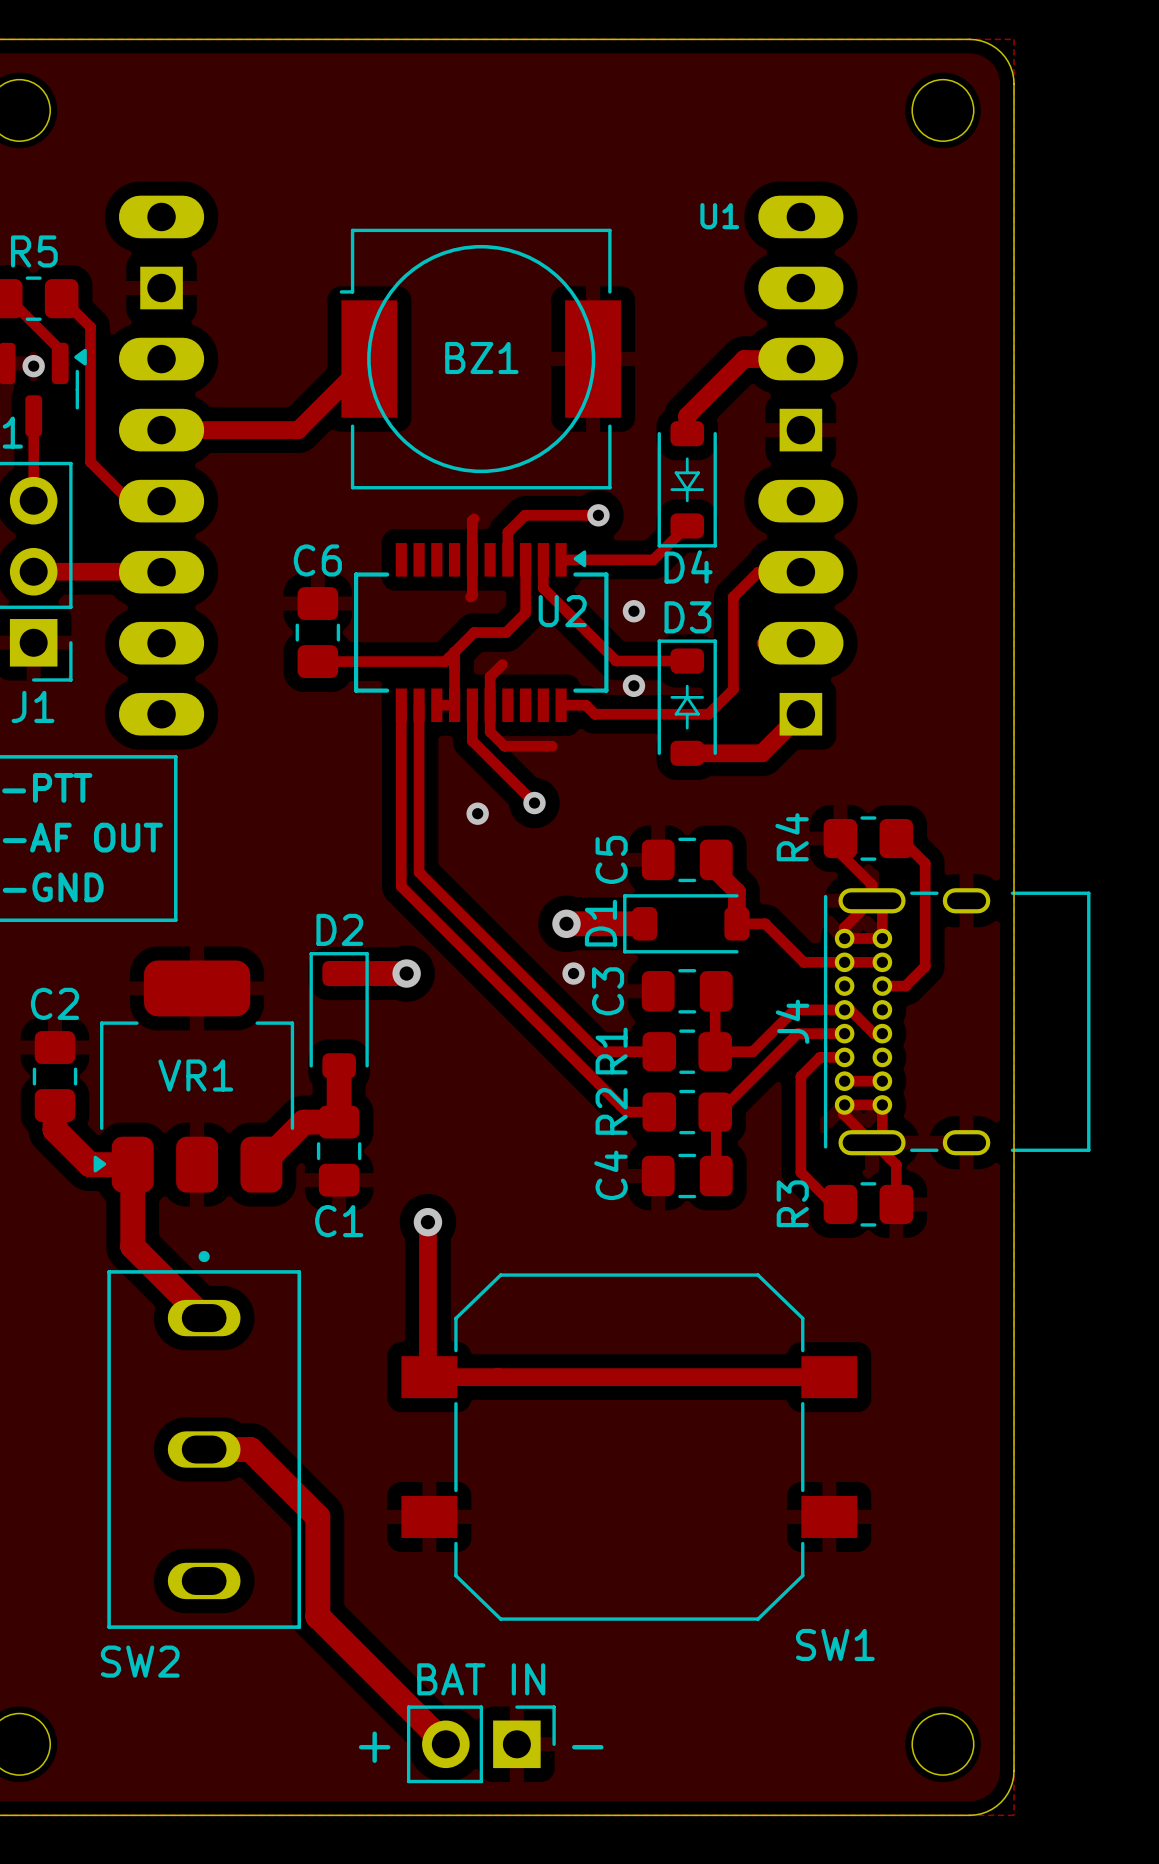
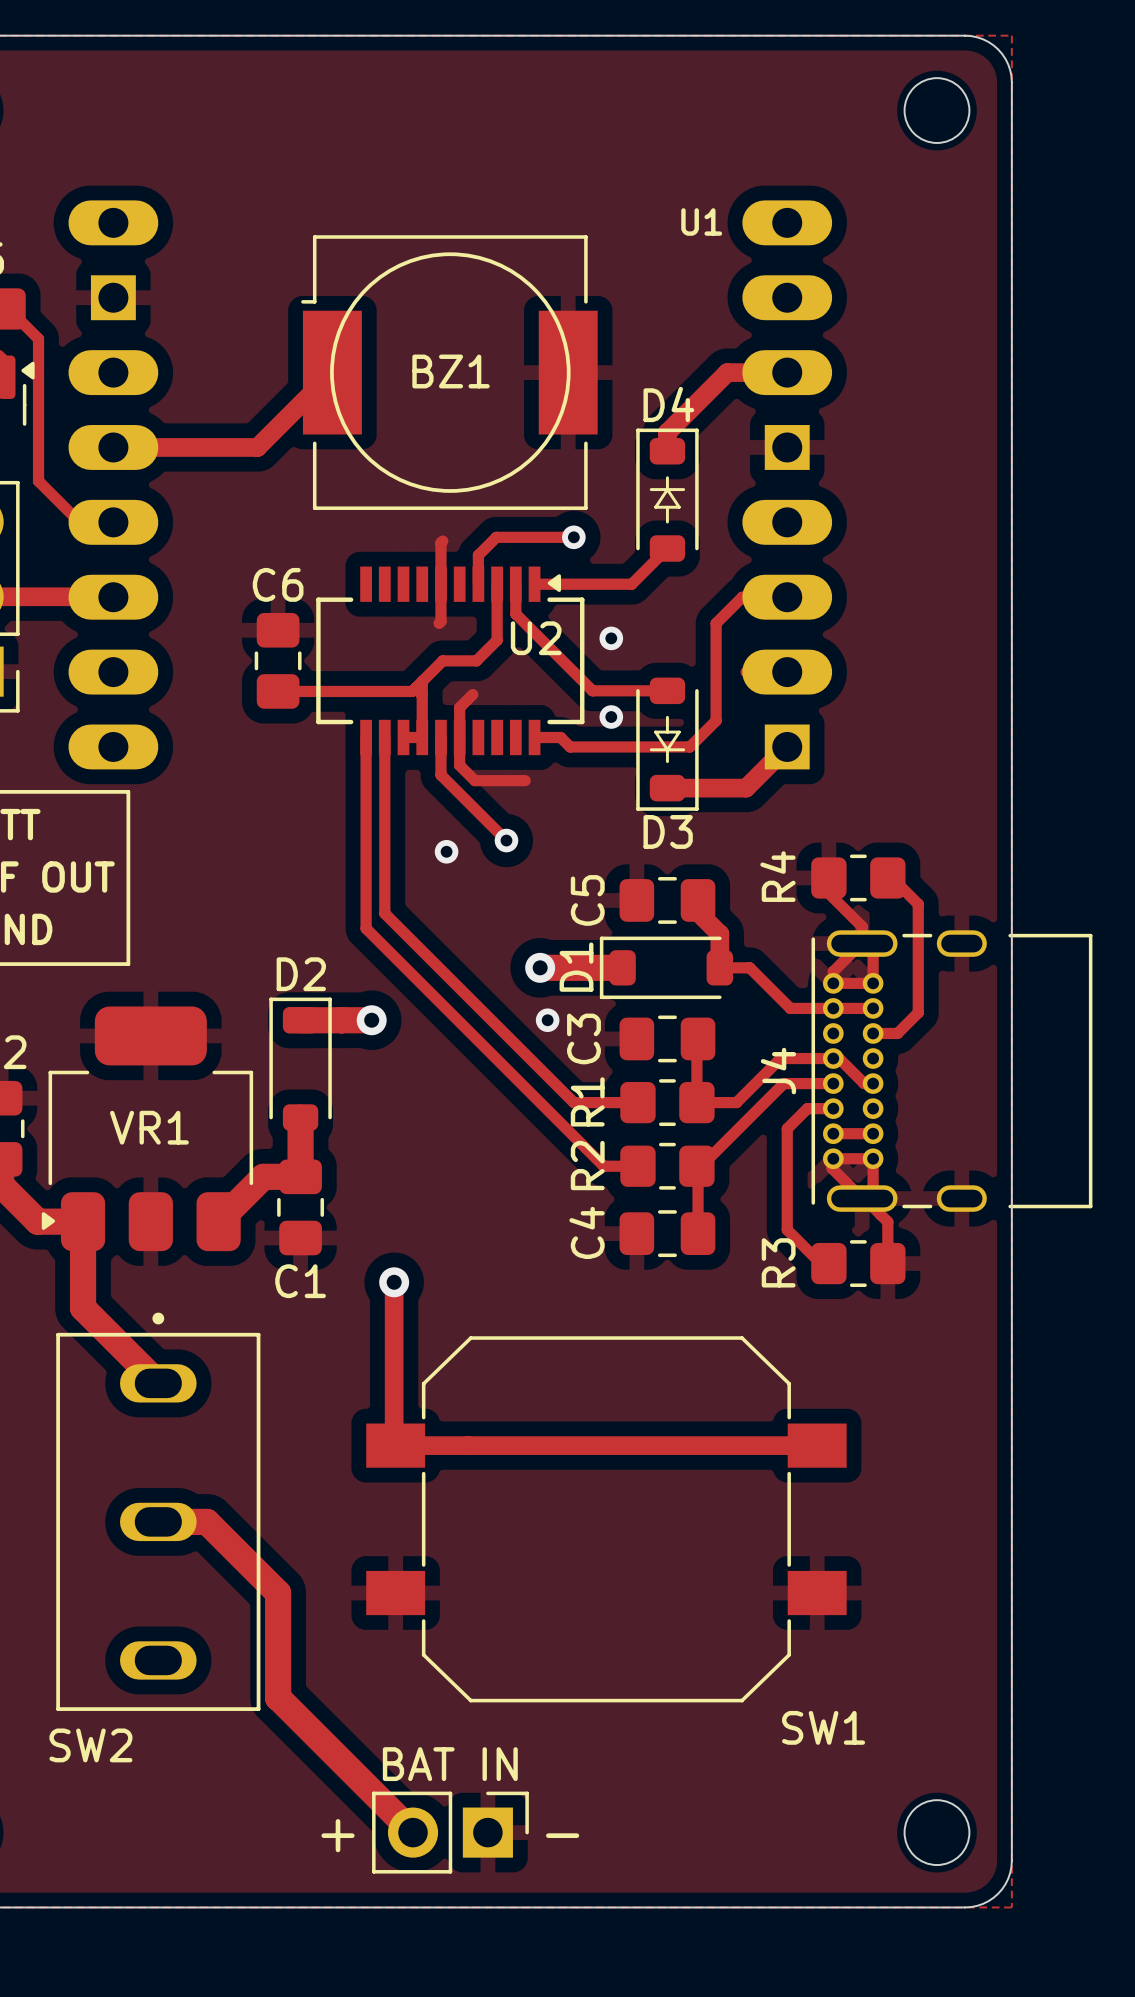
D4 rotation: 0° (687, 484) -> 180° (667, 495)
D3 rotation: 0° (687, 702) -> 180° (667, 744)

